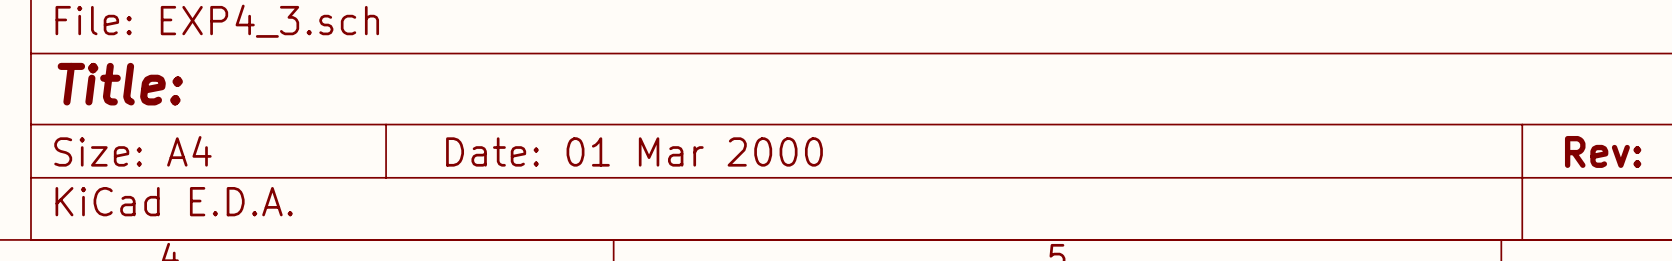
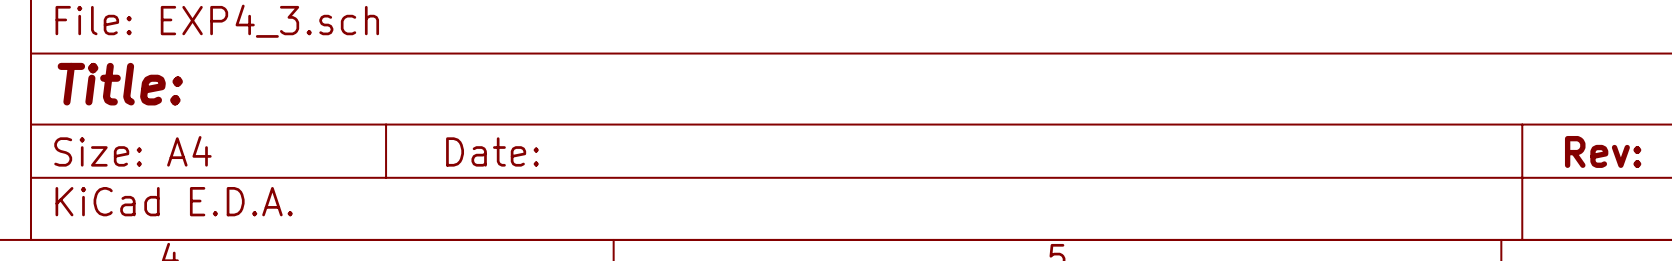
title block: Date: 01 Mar 2000 (634, 151) -> Date: (492, 151)

